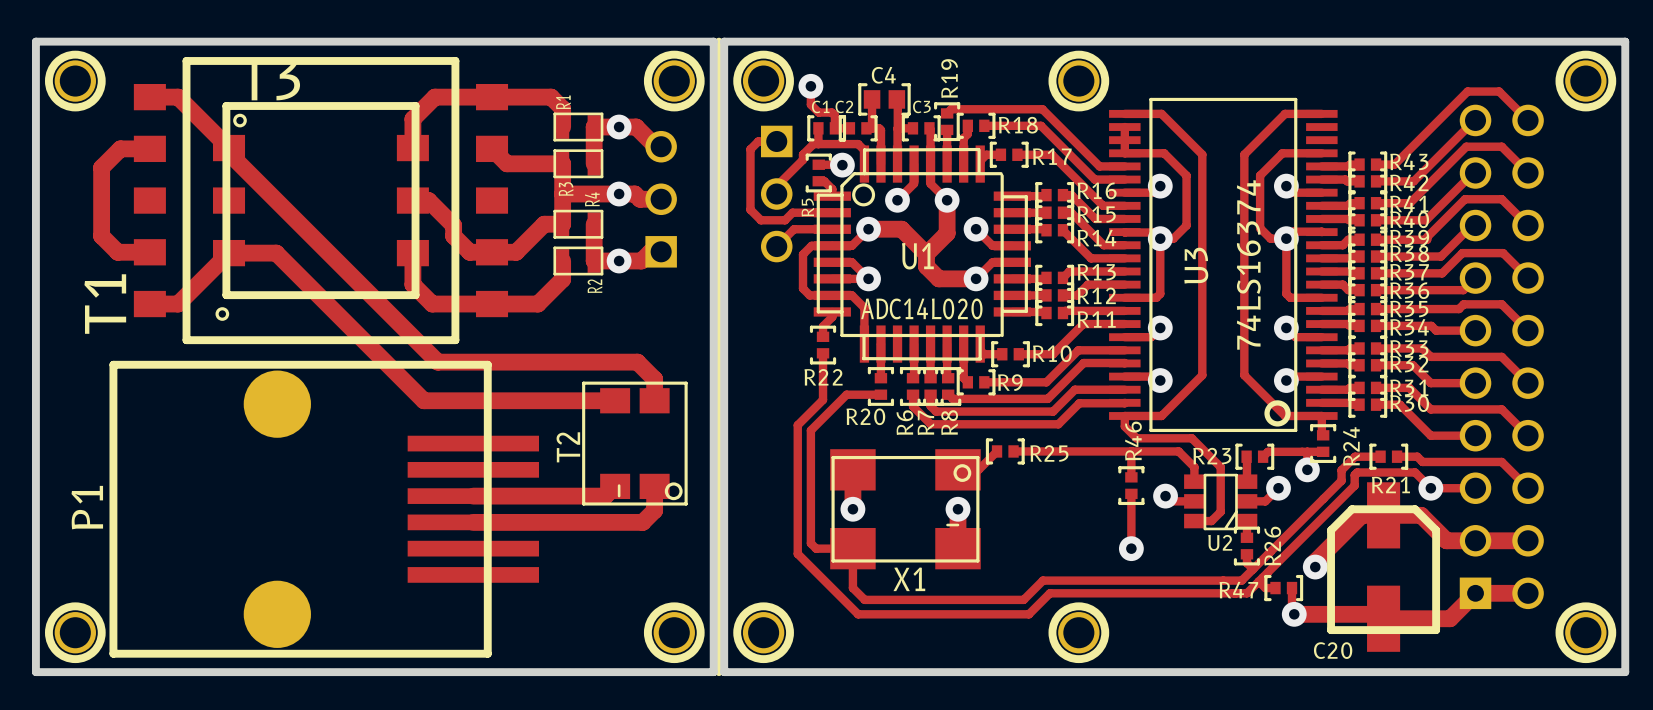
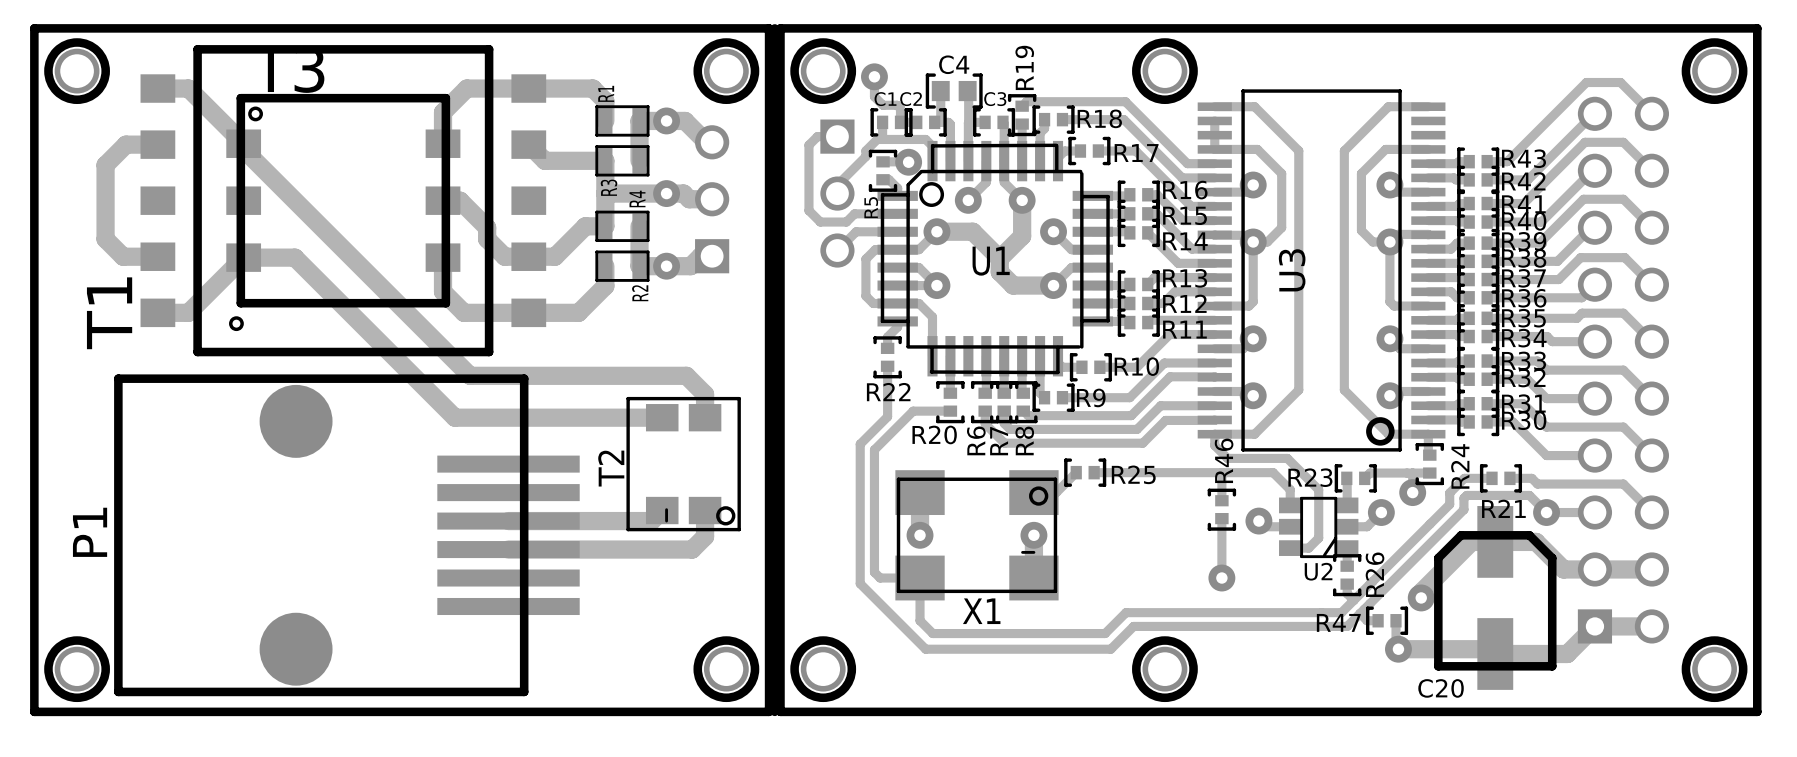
U3 value: 74LS16374 (1248, 264) -> none
U1 value: ADC14L020 (921, 308) -> none

